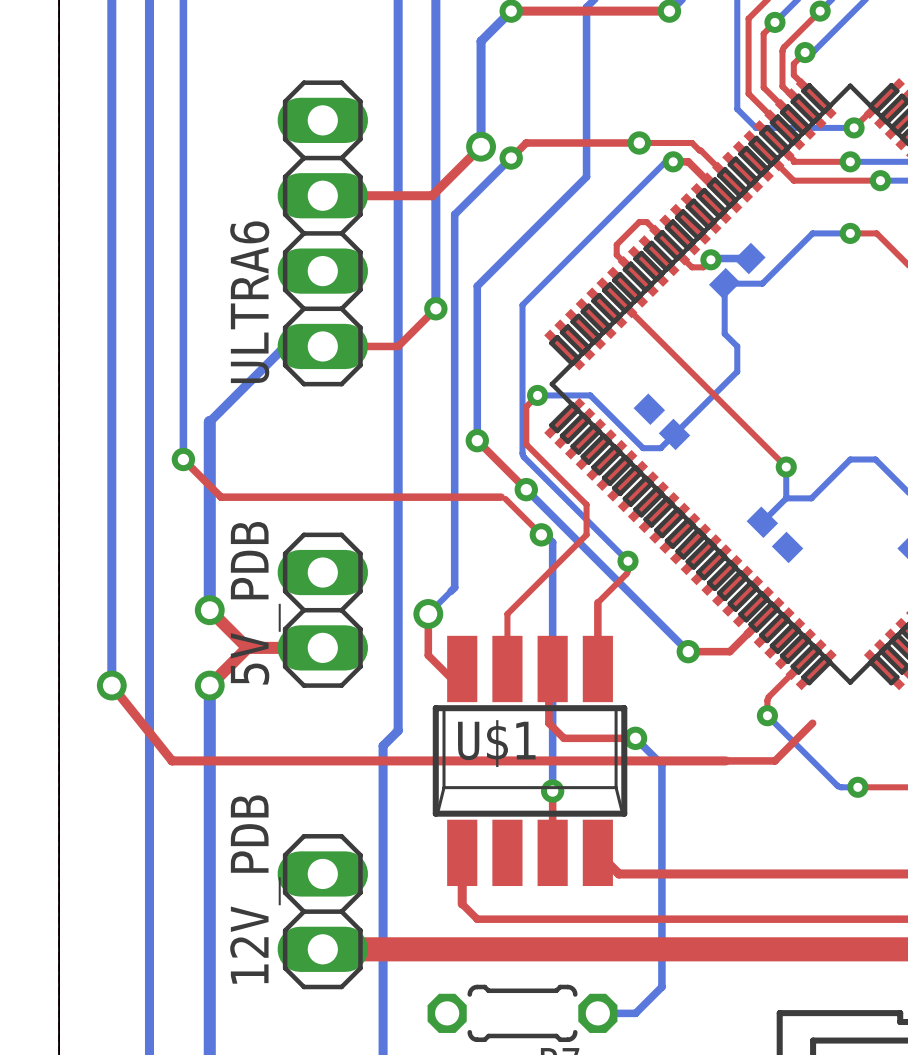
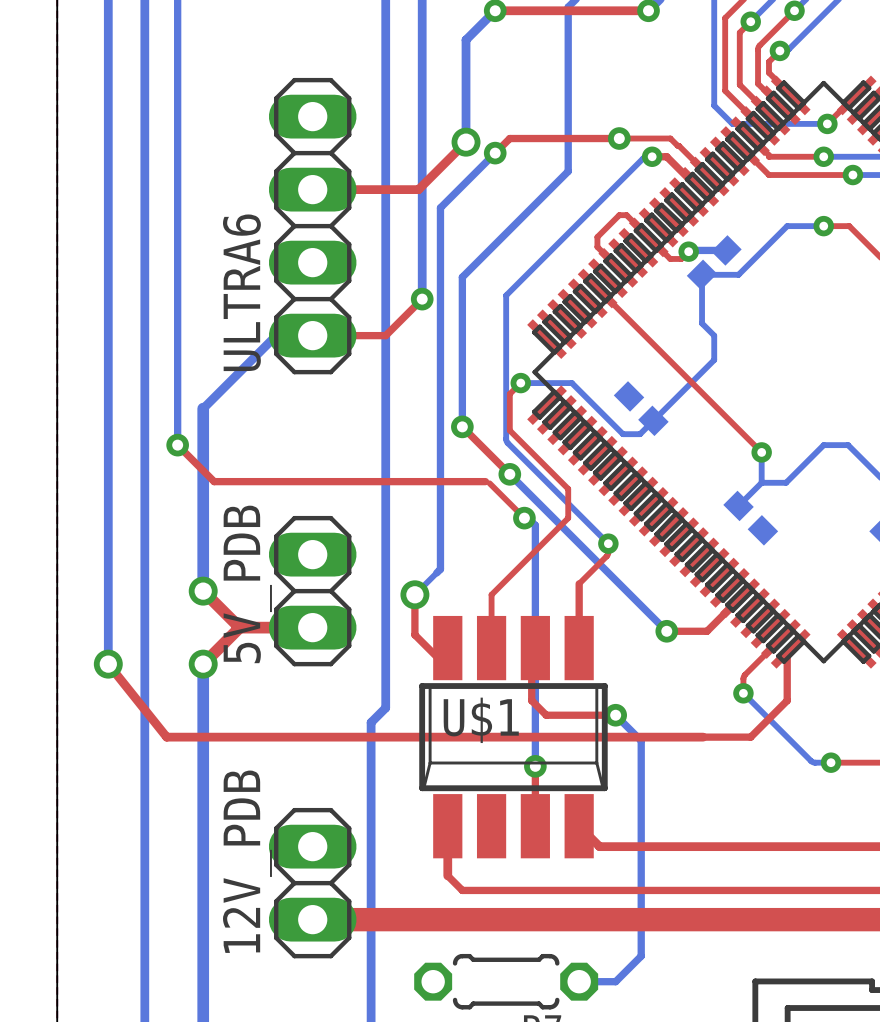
top track: none -> (790, 648) (787, 652) (787, 700)

